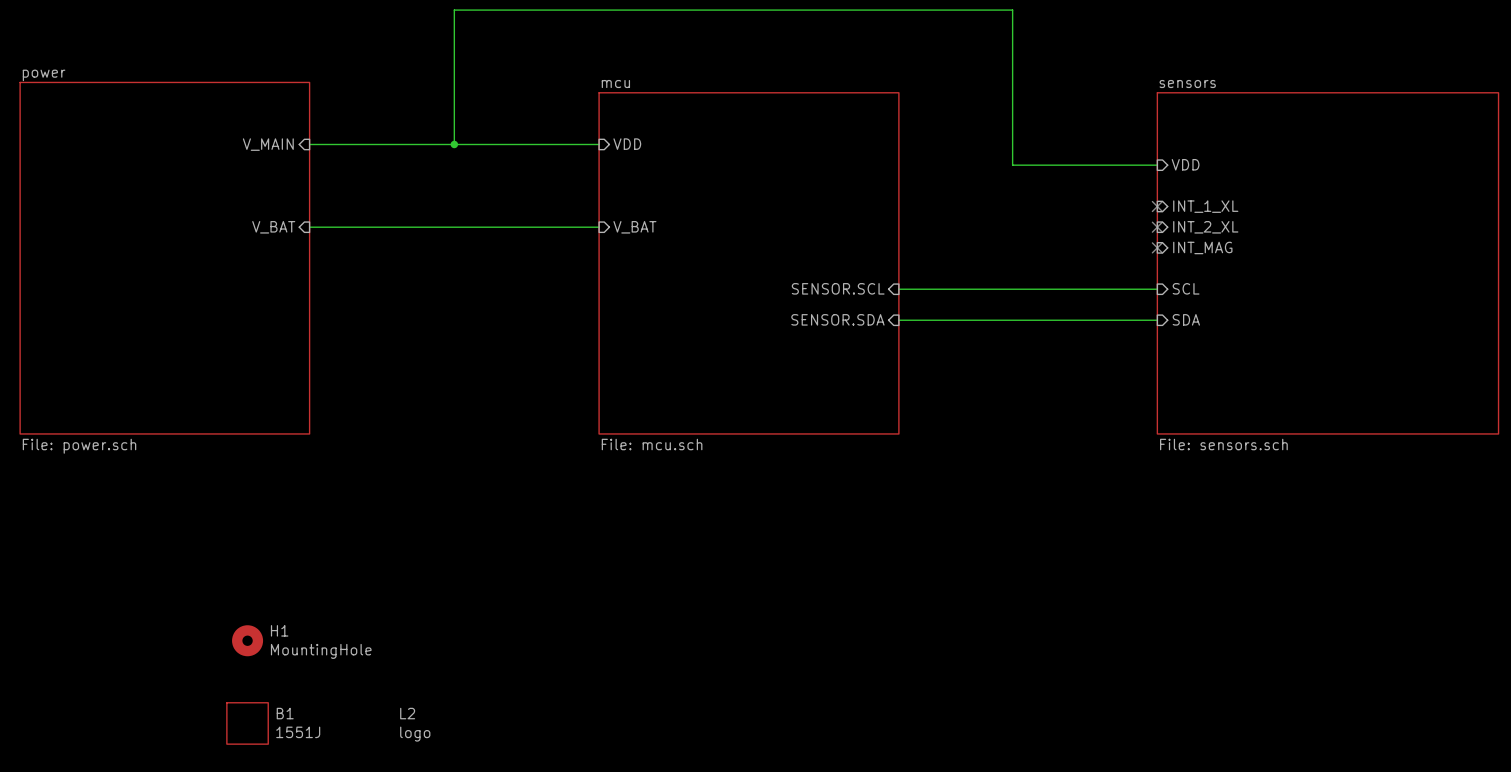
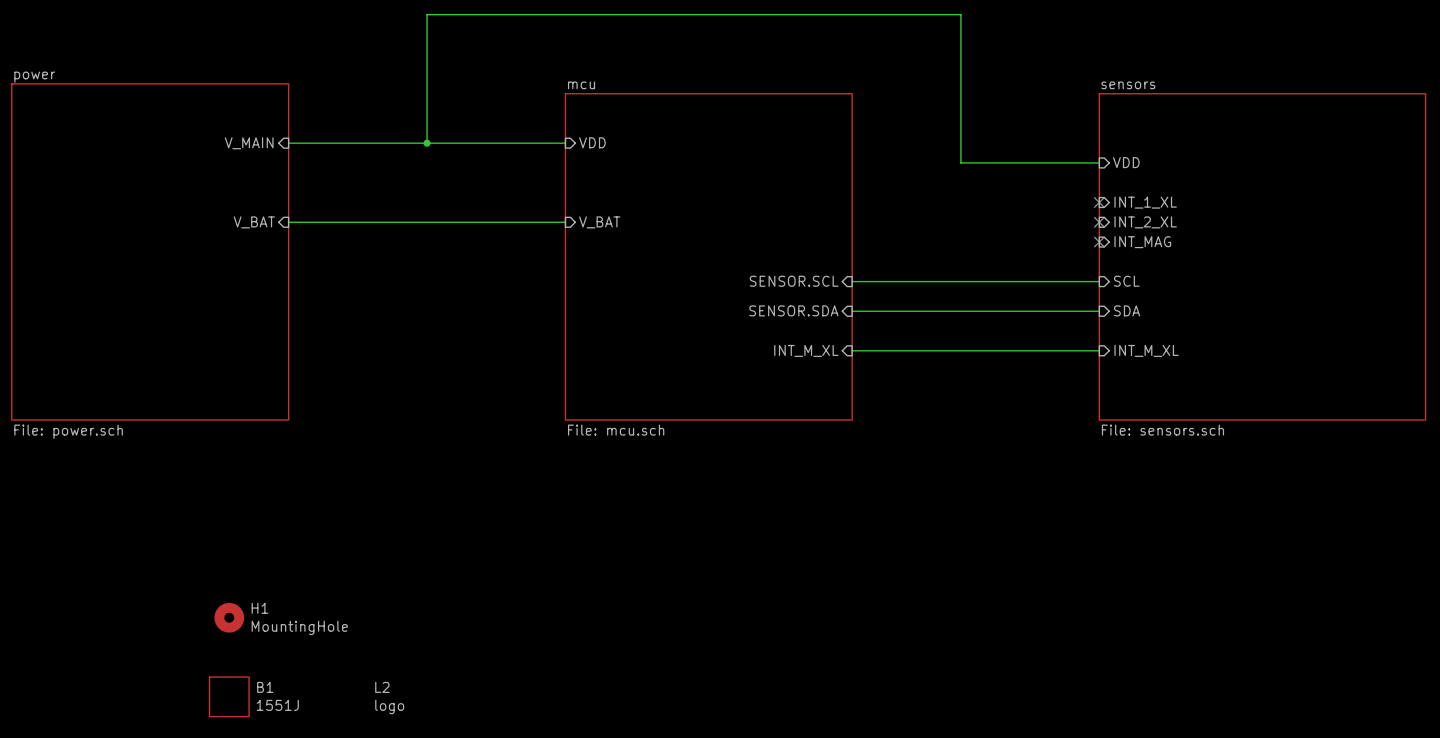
sheet pin: none -> INT_M_XL (806, 350)
wire: none -> (852, 350) (1099, 350)
sheet pin: none -> INT_M_XL (1146, 350)

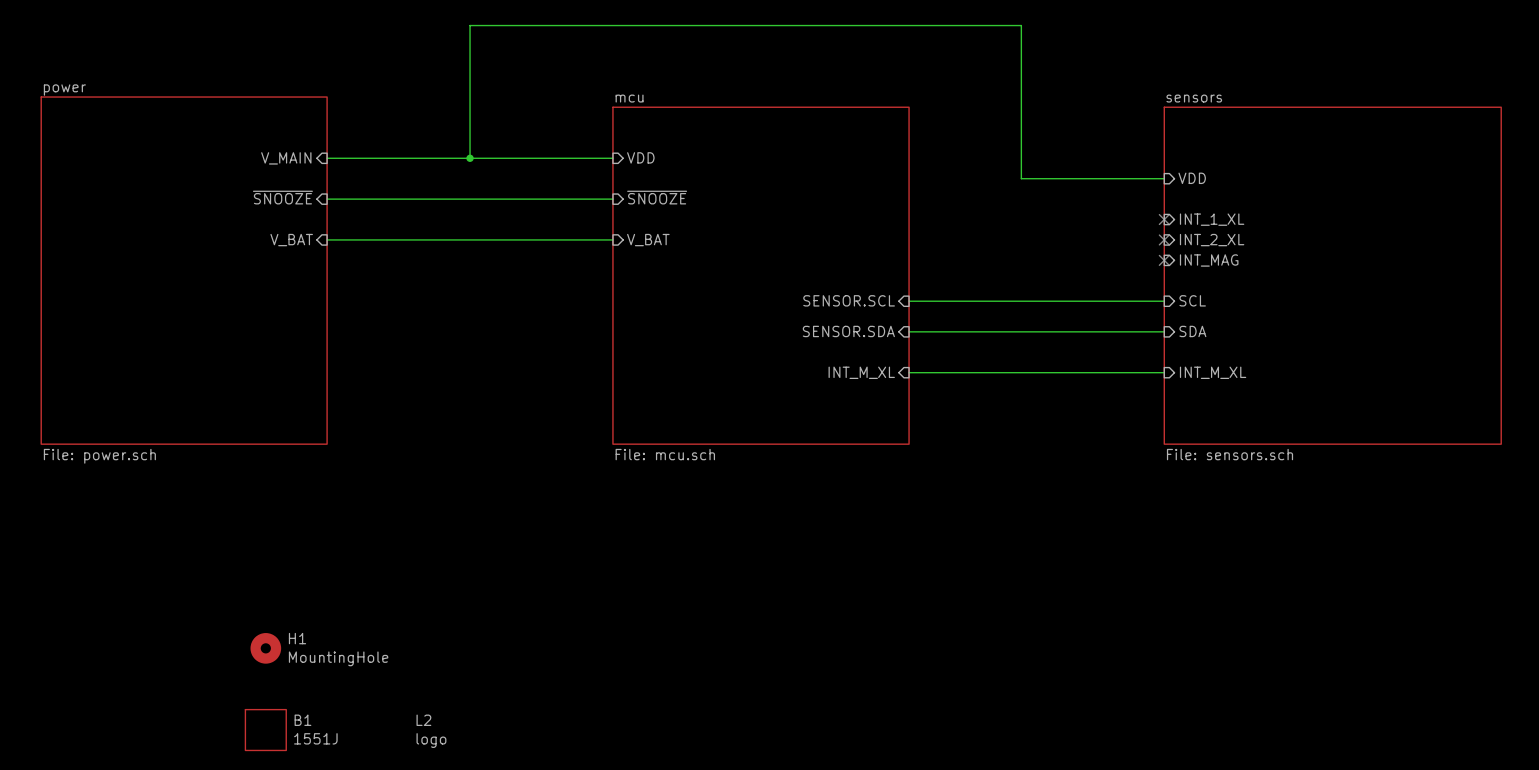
sheet pin: none -> ~{SNOOZE} (282, 197)
sheet pin: none -> ~{SNOOZE} (657, 197)
wire: none -> (327, 199) (612, 199)

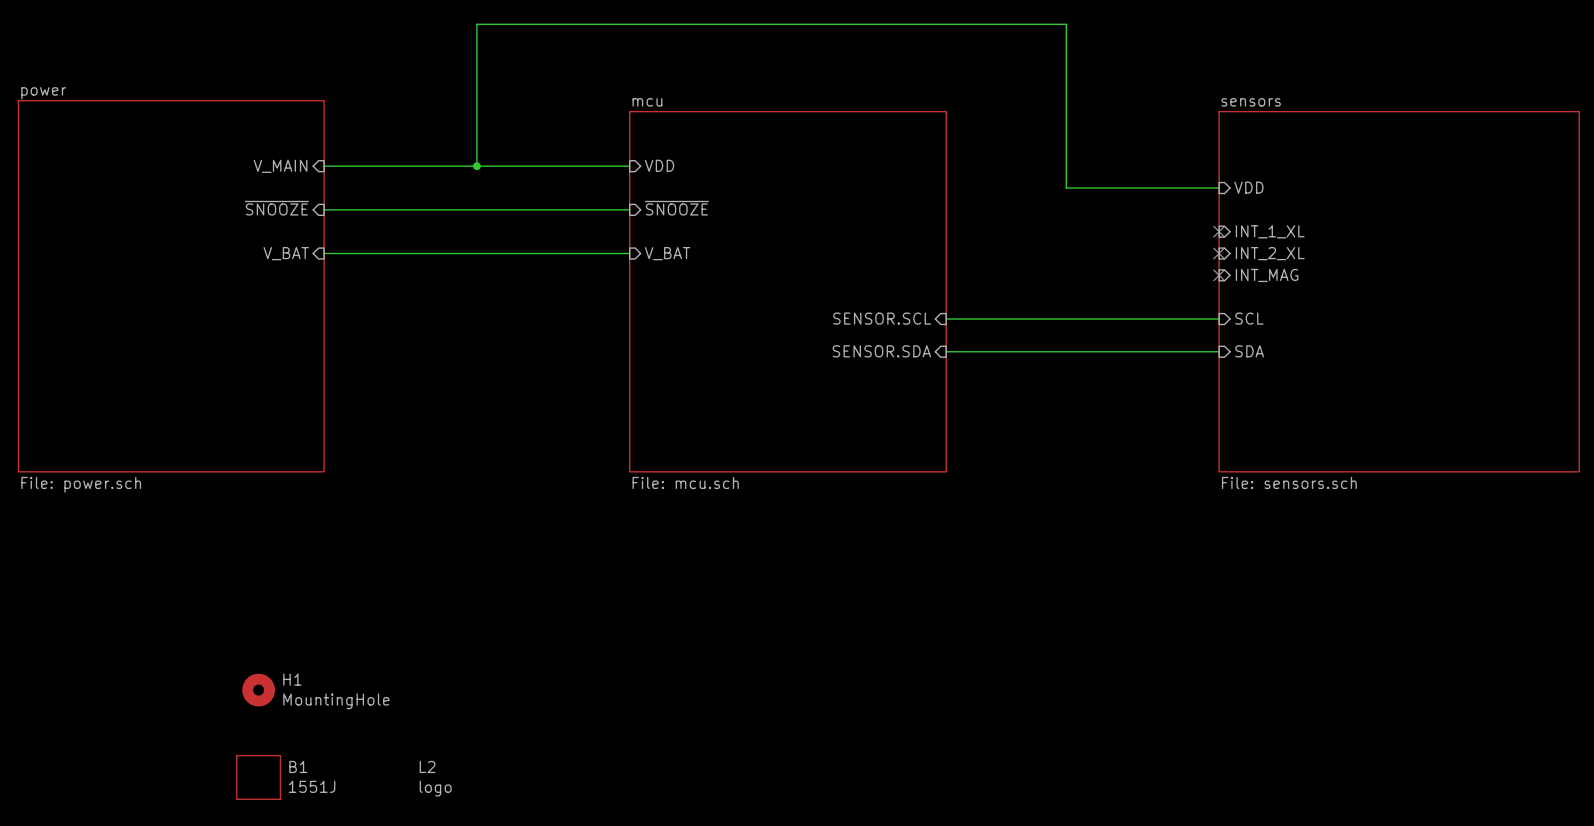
sheet pin: INT_M_XL (861, 372) -> none
wire: (909, 372) (1164, 372) -> none
sheet pin: INT_M_XL (1213, 372) -> none

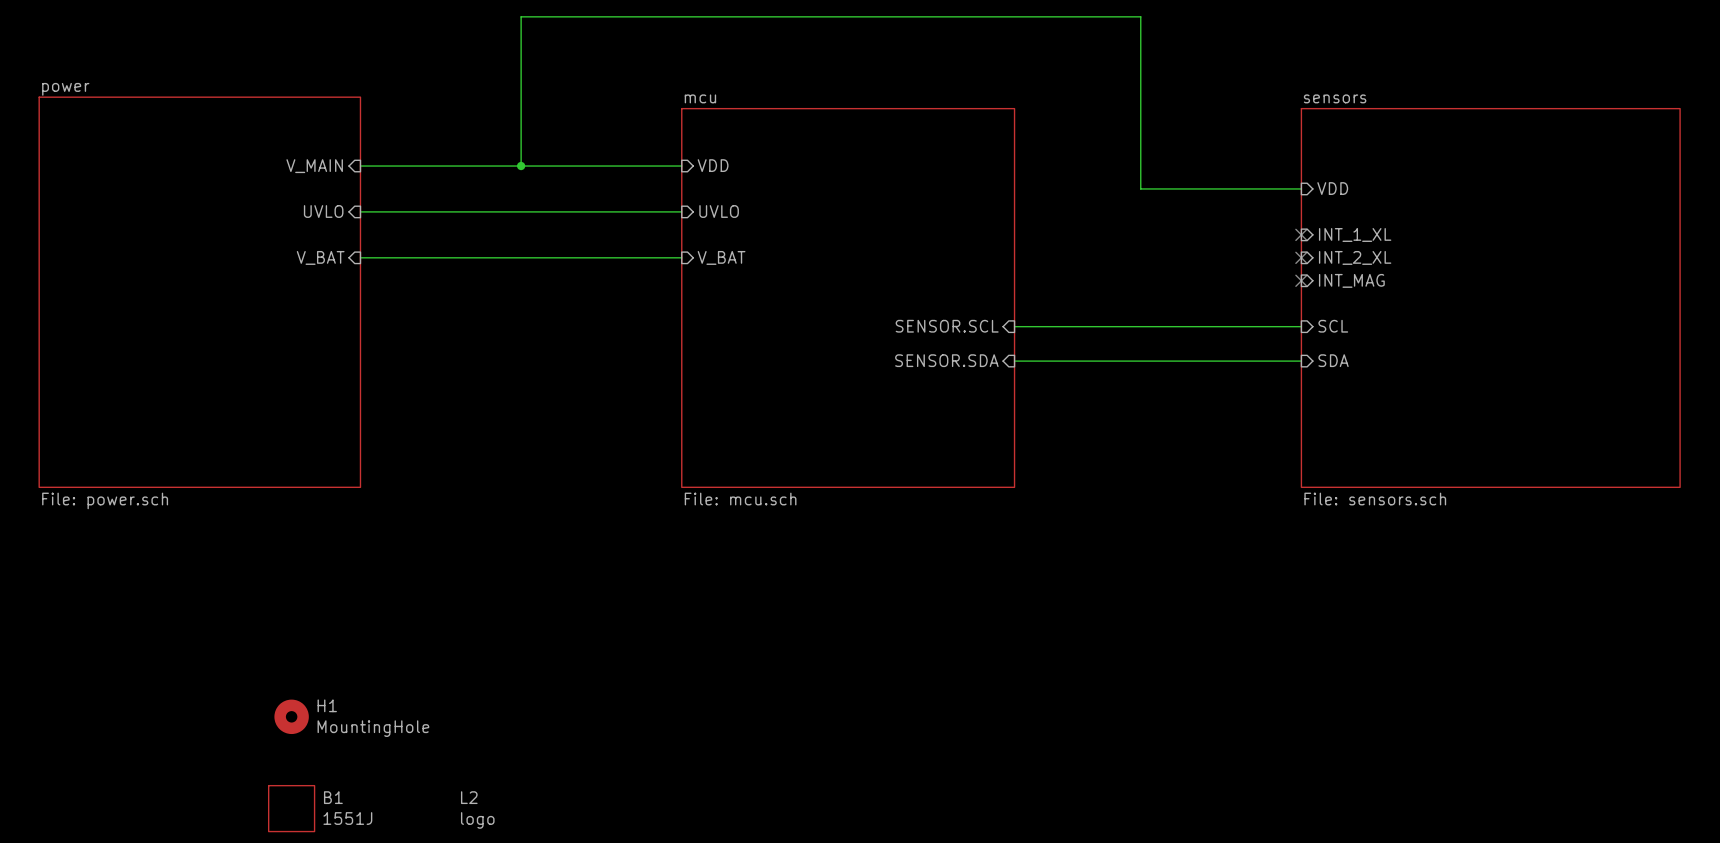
sheet pin: ~{SNOOZE} (276, 208) -> UVLO (323, 211)
sheet pin: ~{SNOOZE} (676, 208) -> UVLO (719, 211)

